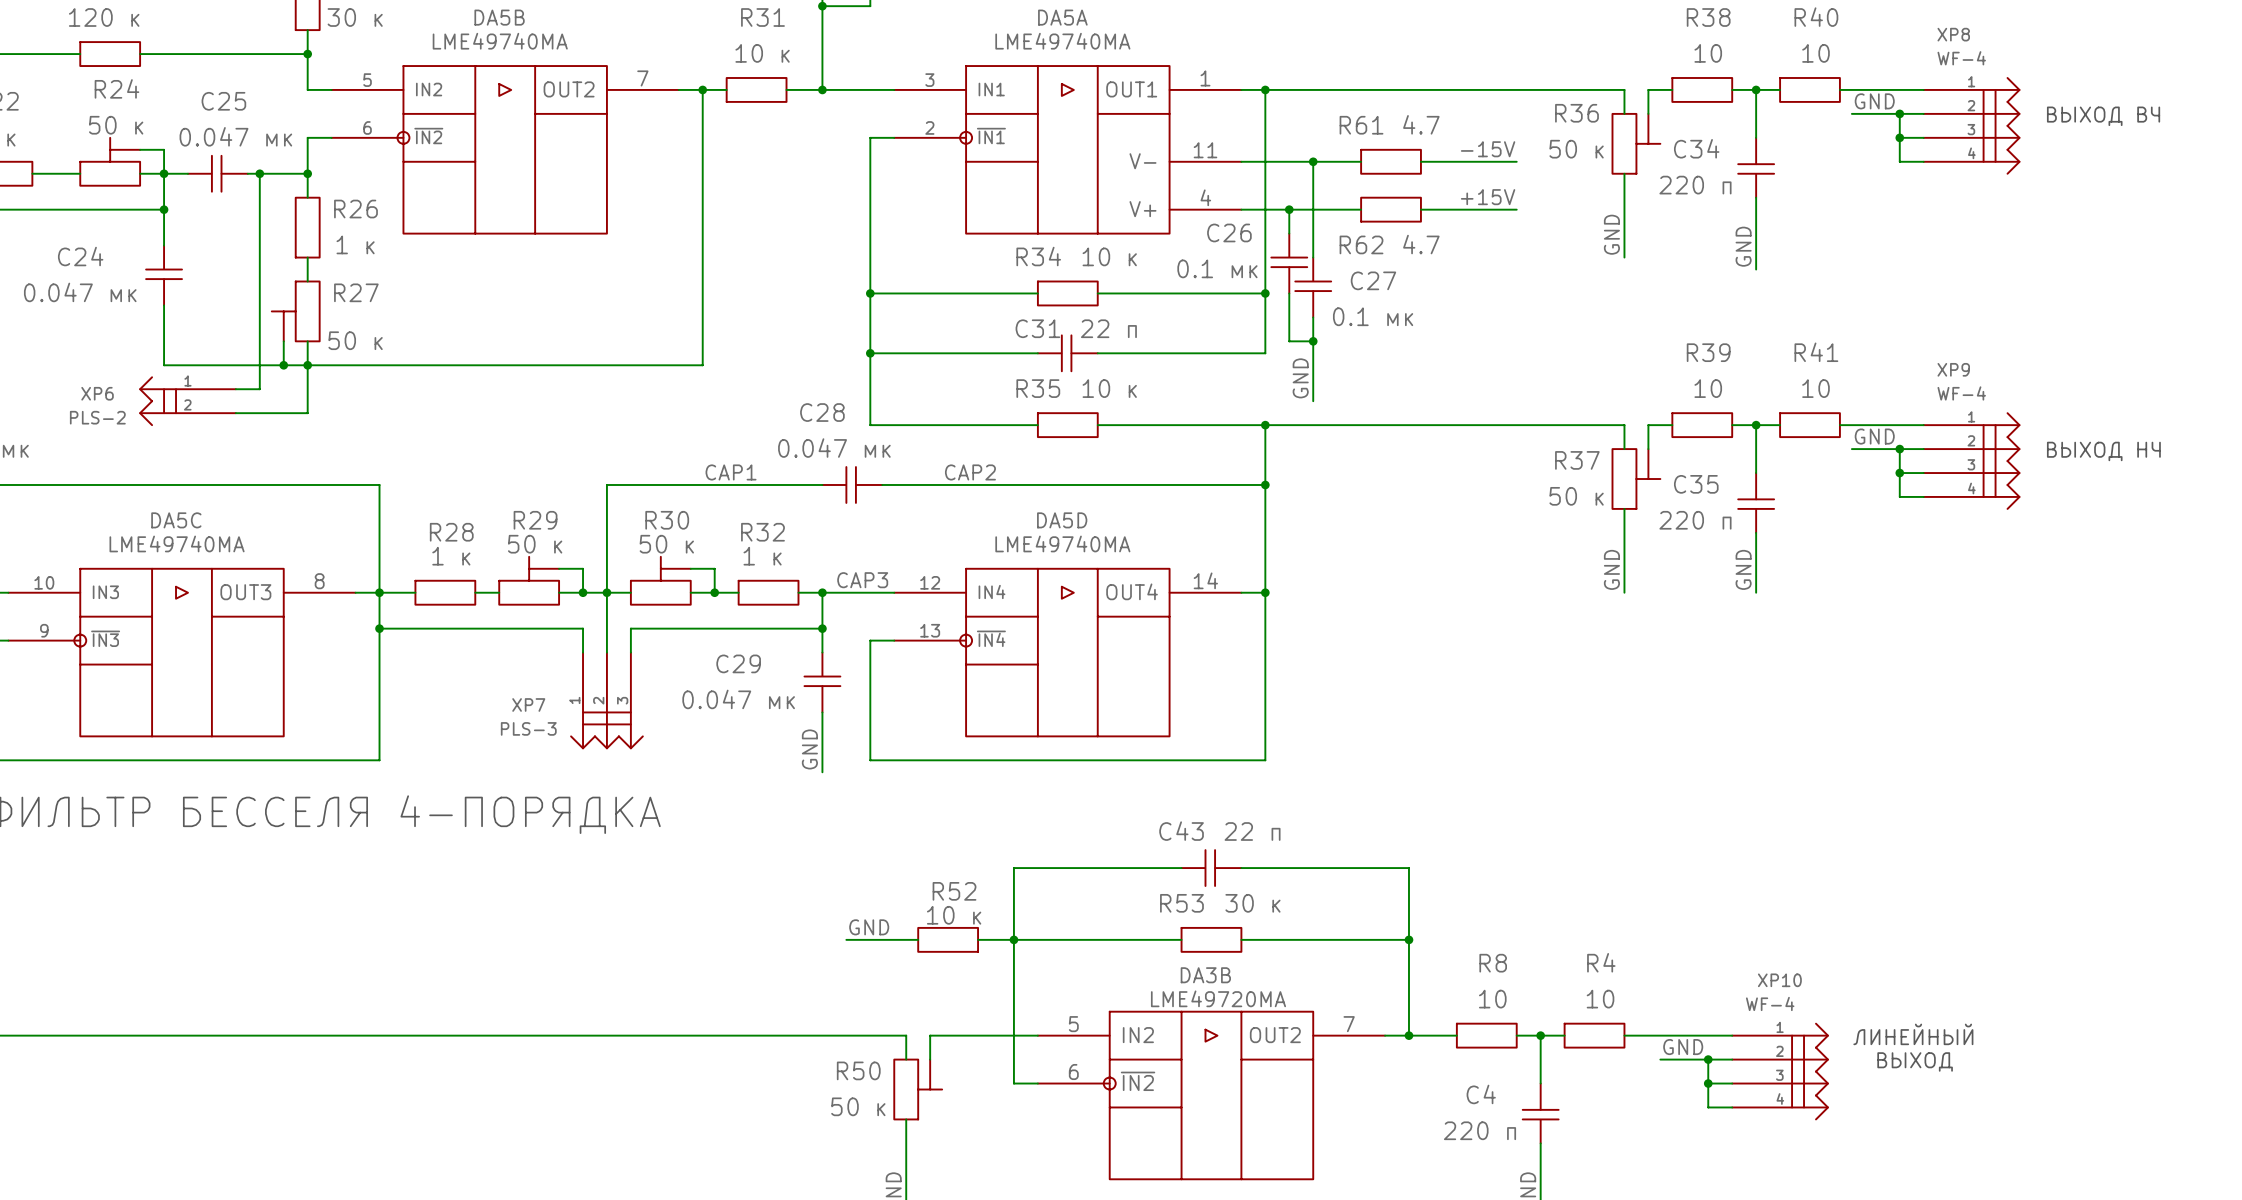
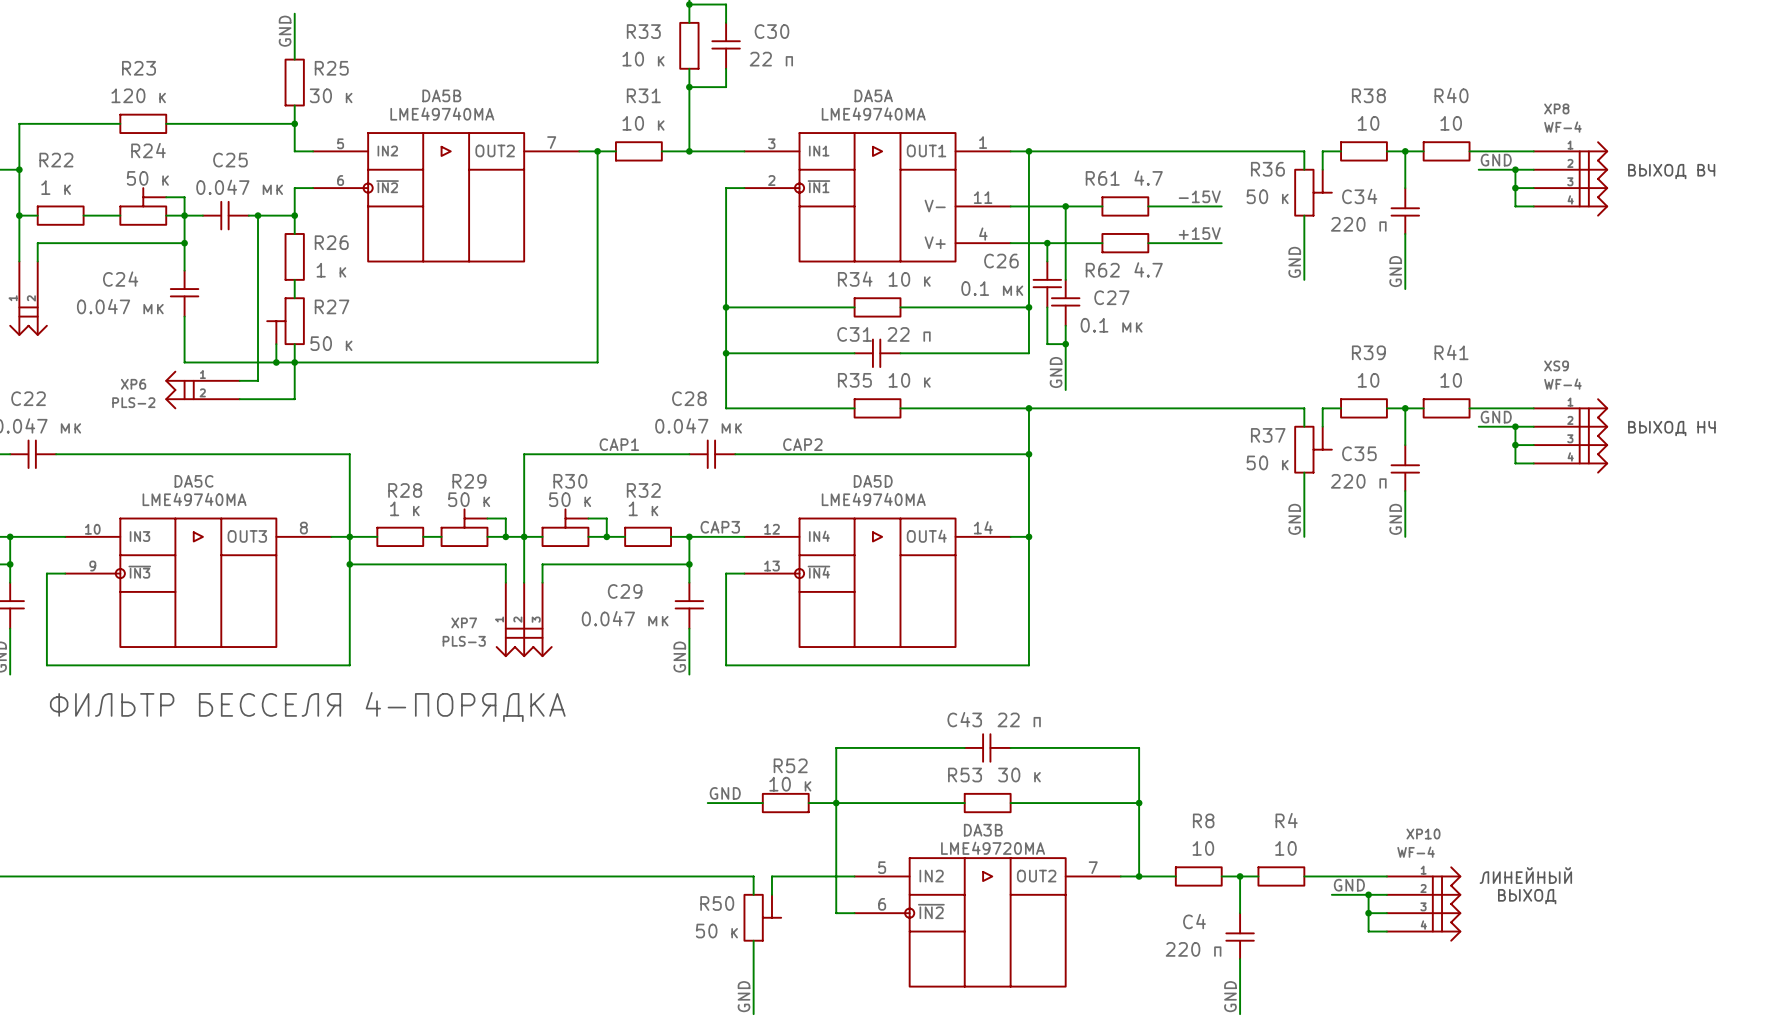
XP9 name: XP9 (1953, 369) -> XS9 (1556, 365)

